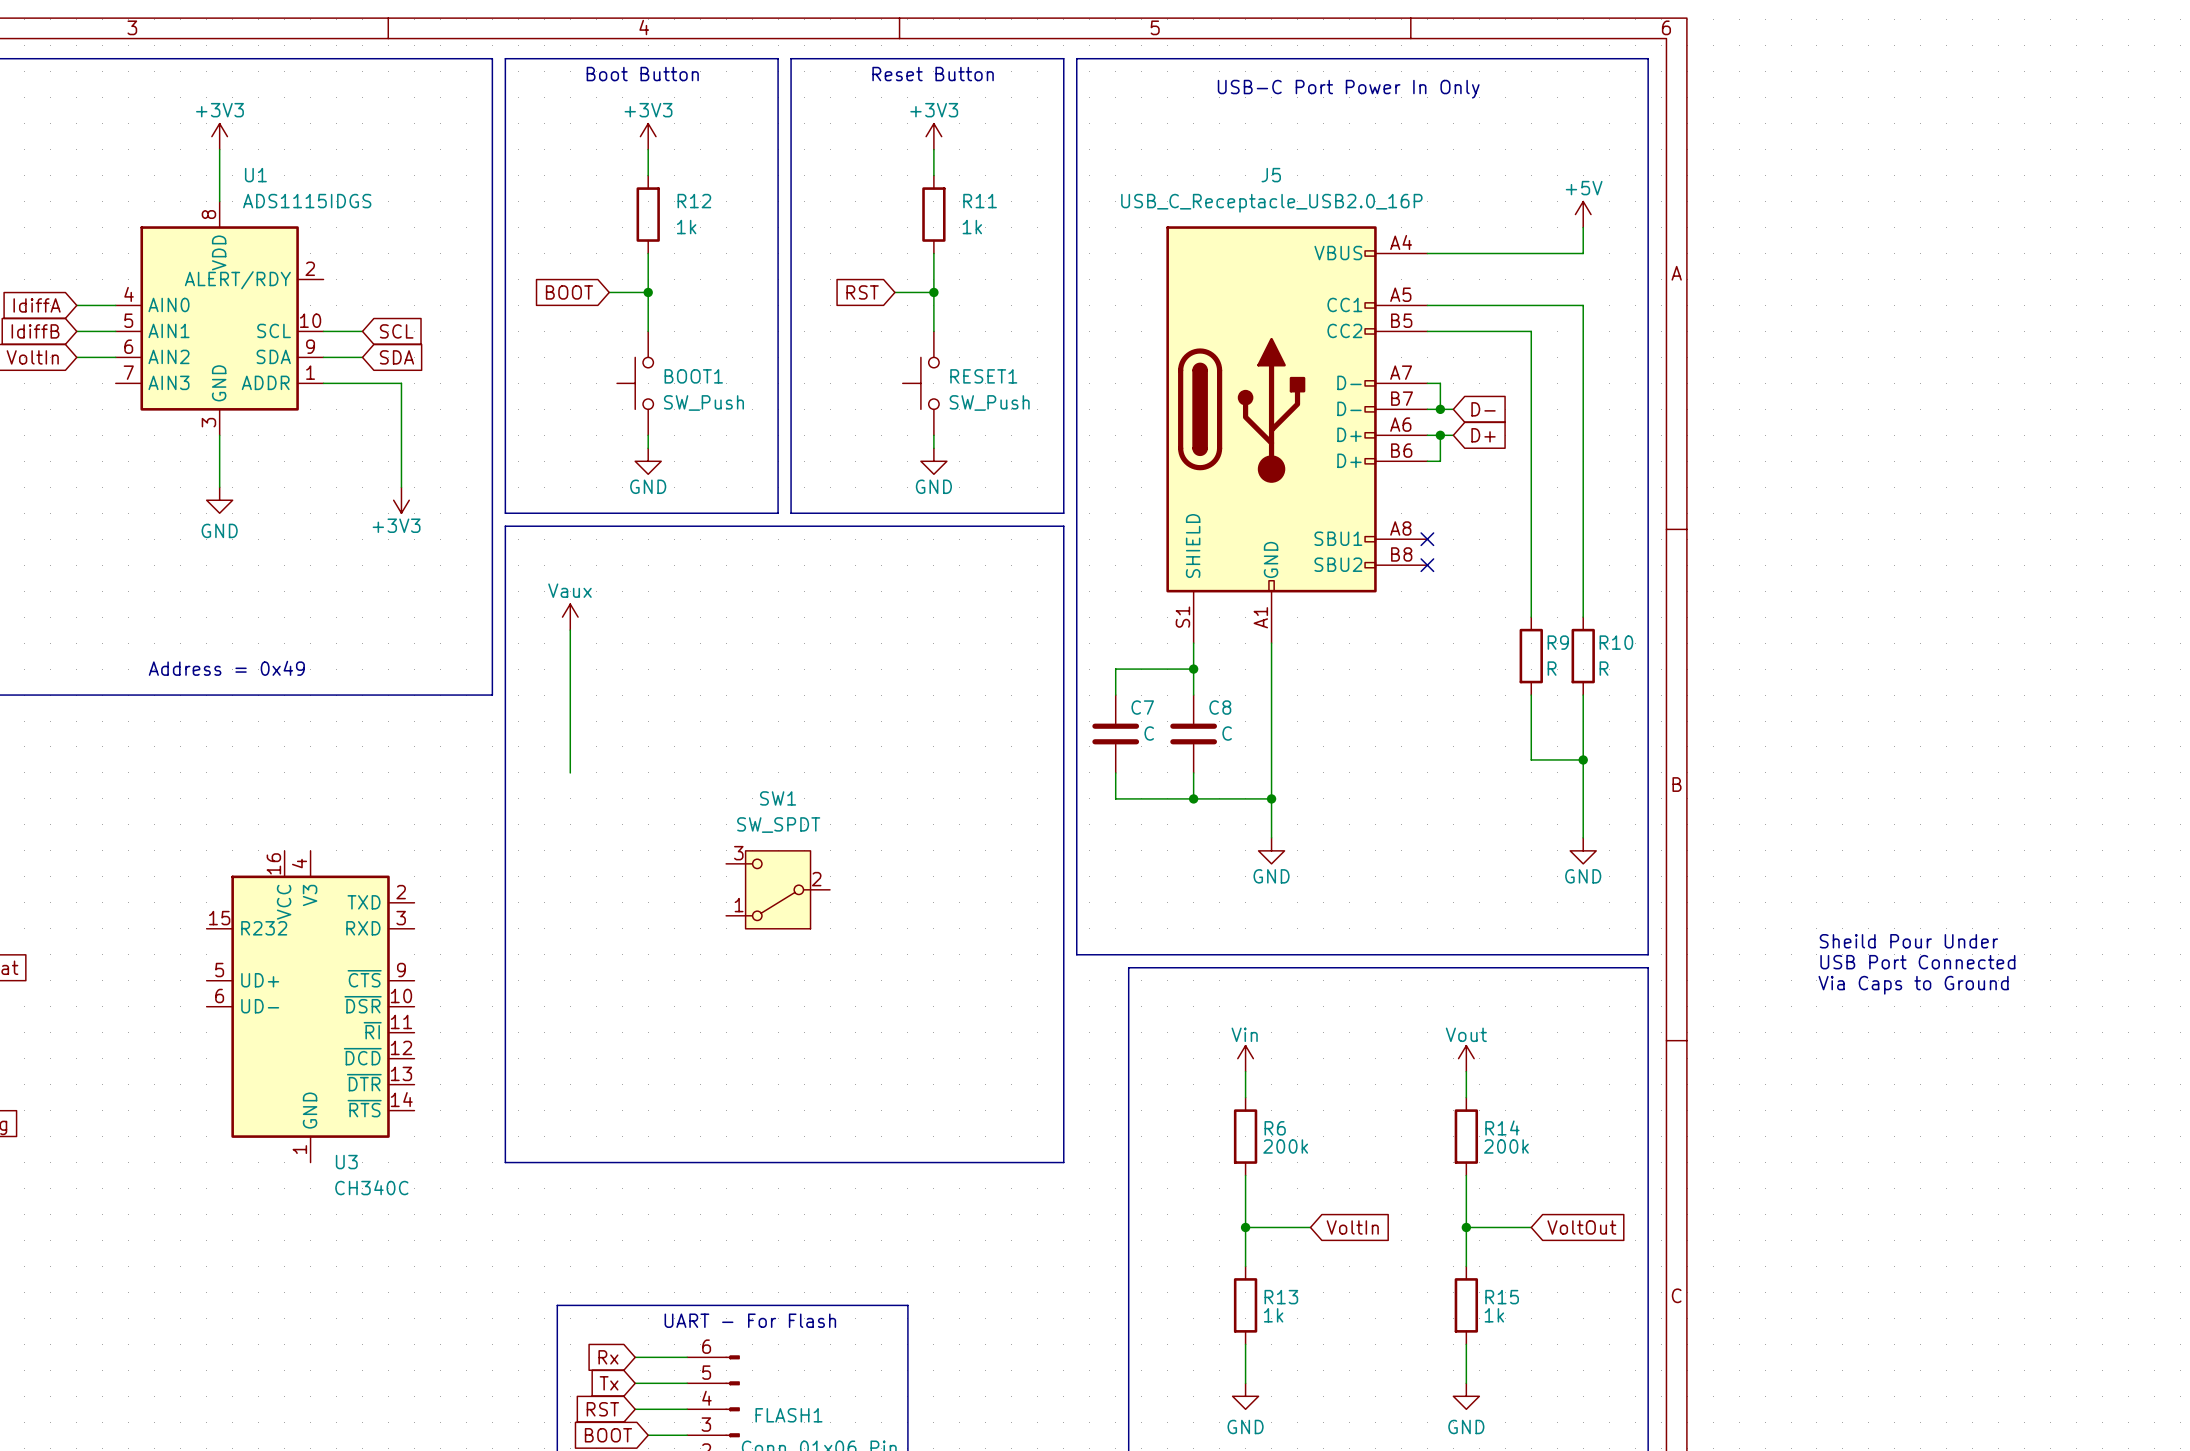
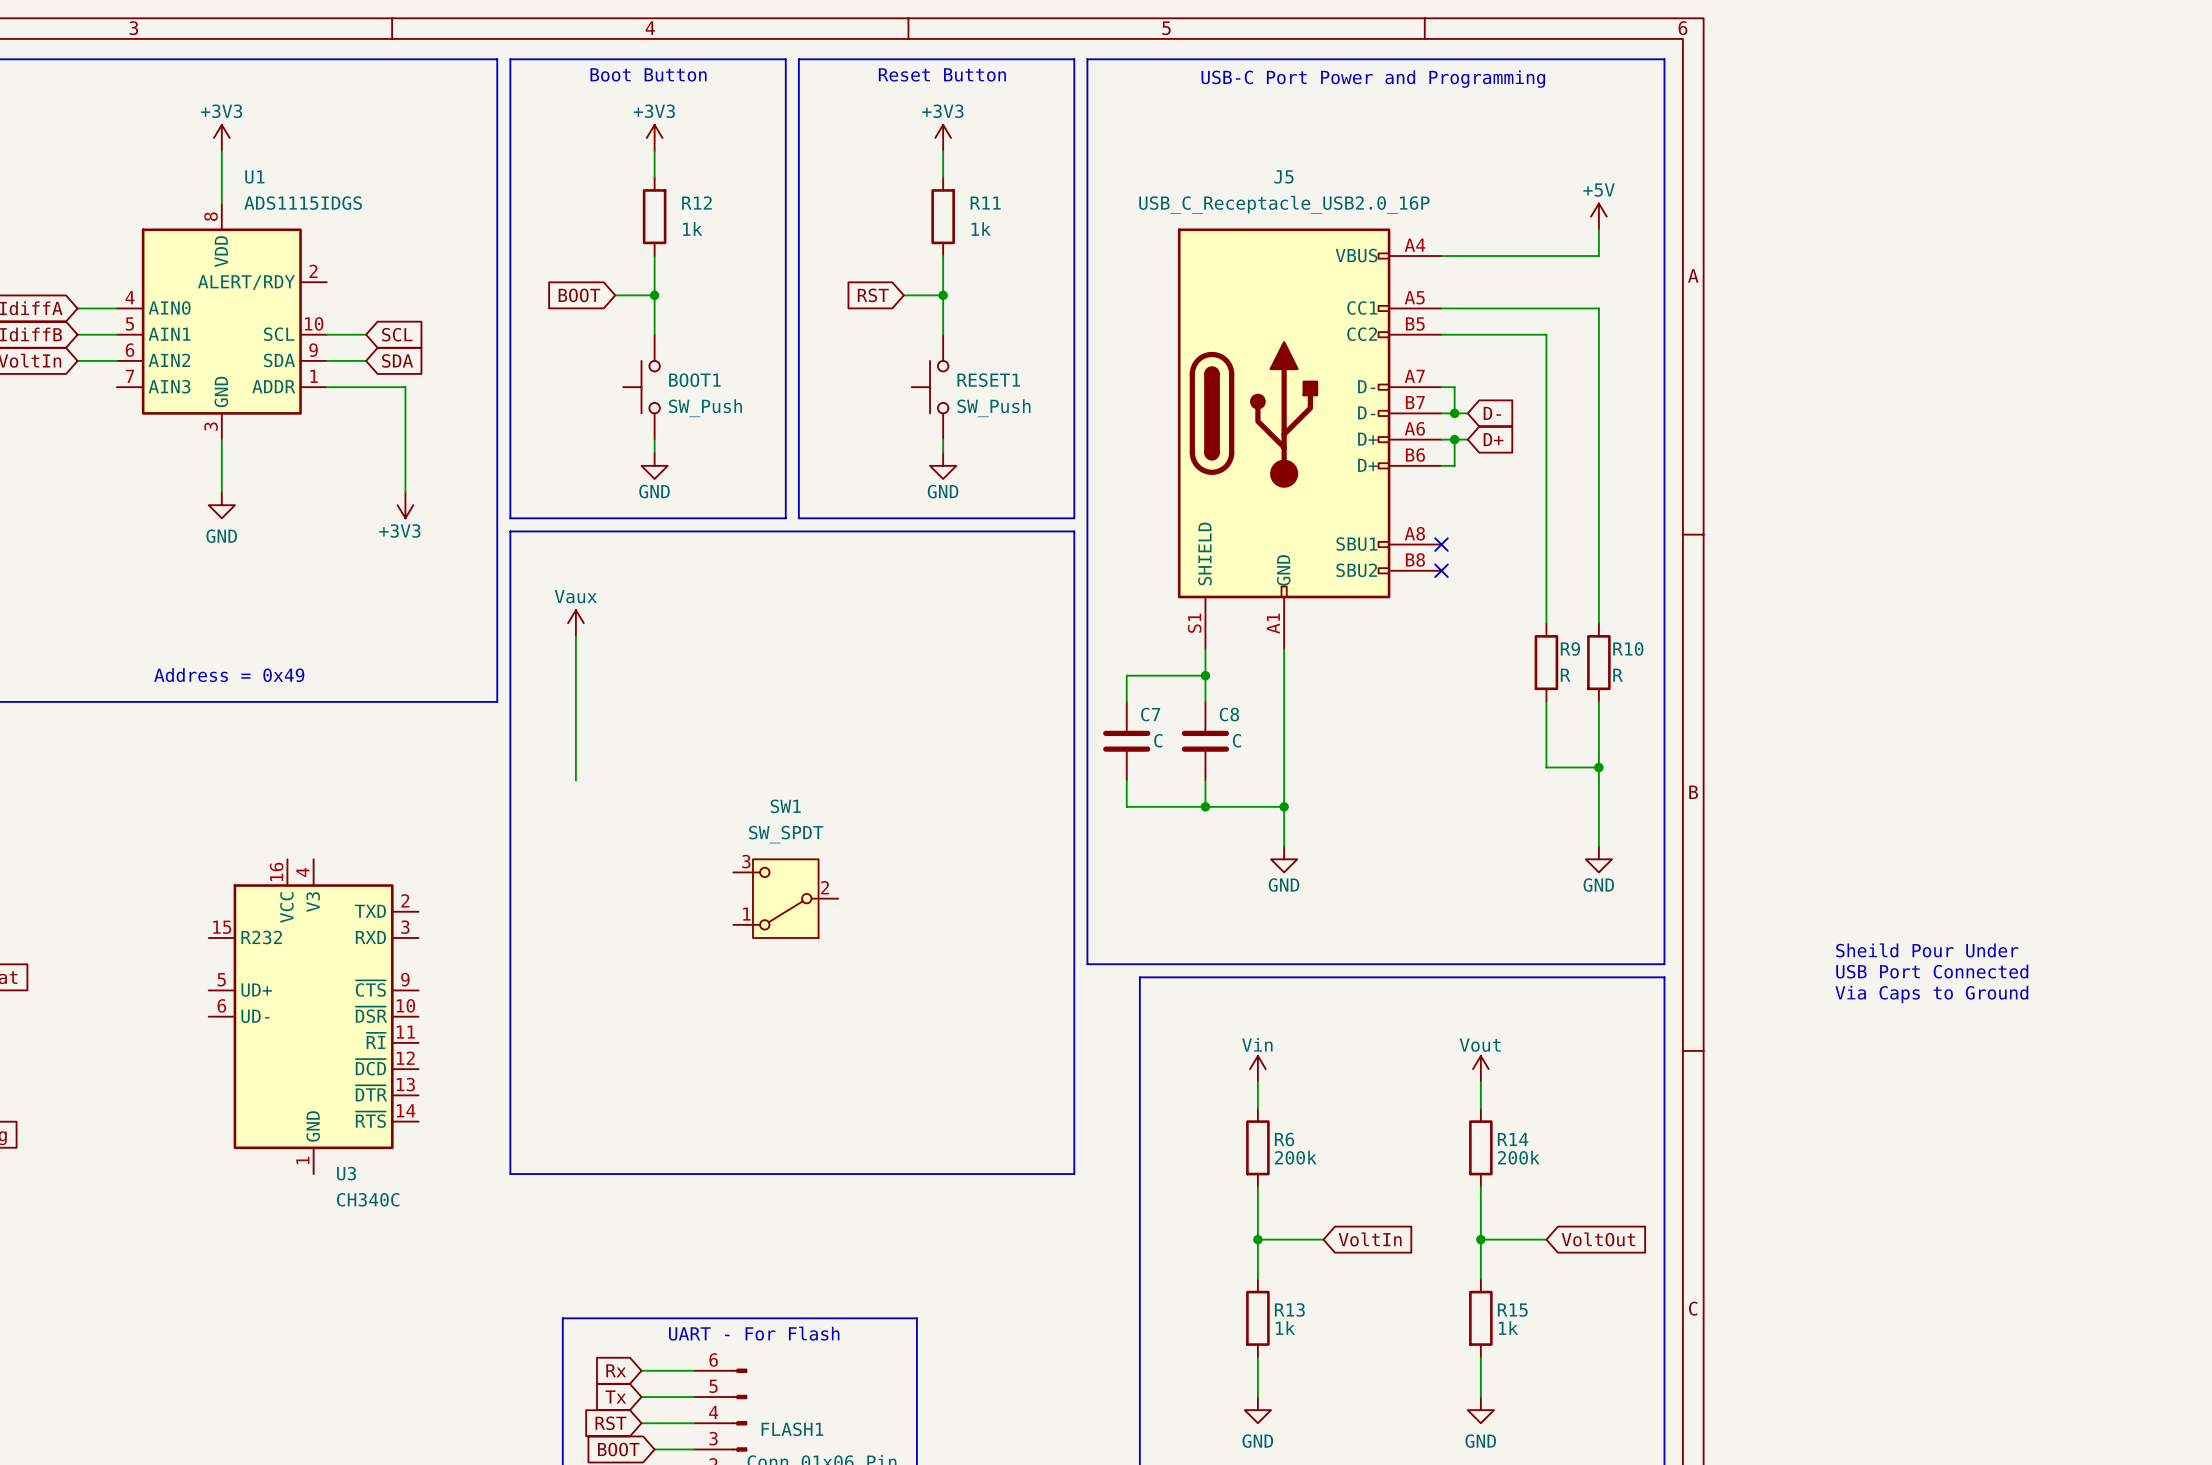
text: USB-C Port Power In Only (1348, 89) -> USB-C Port Power and Programming (1373, 79)

